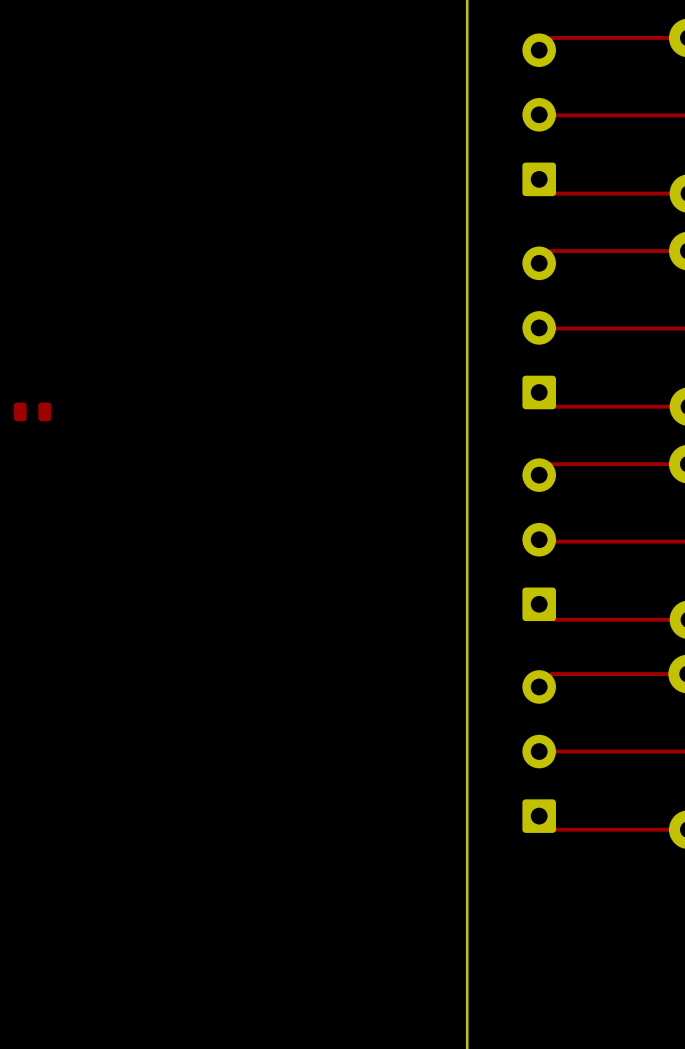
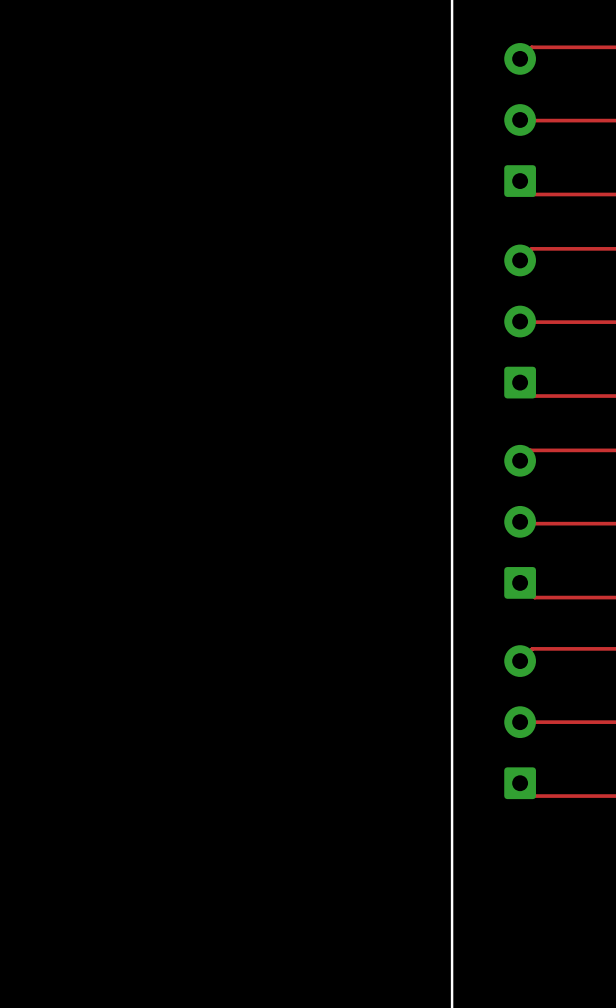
part: (32, 411) -> none

